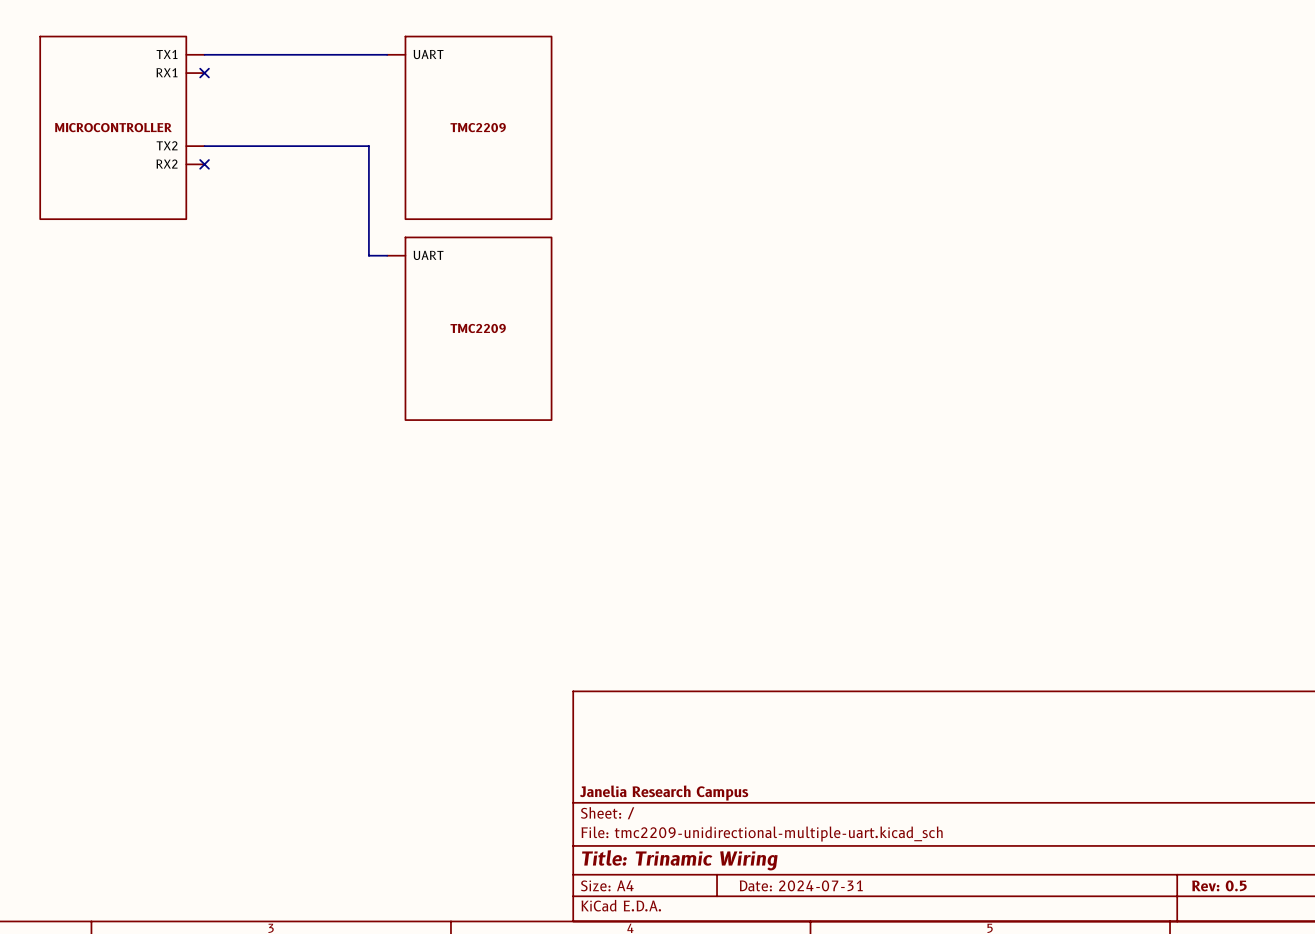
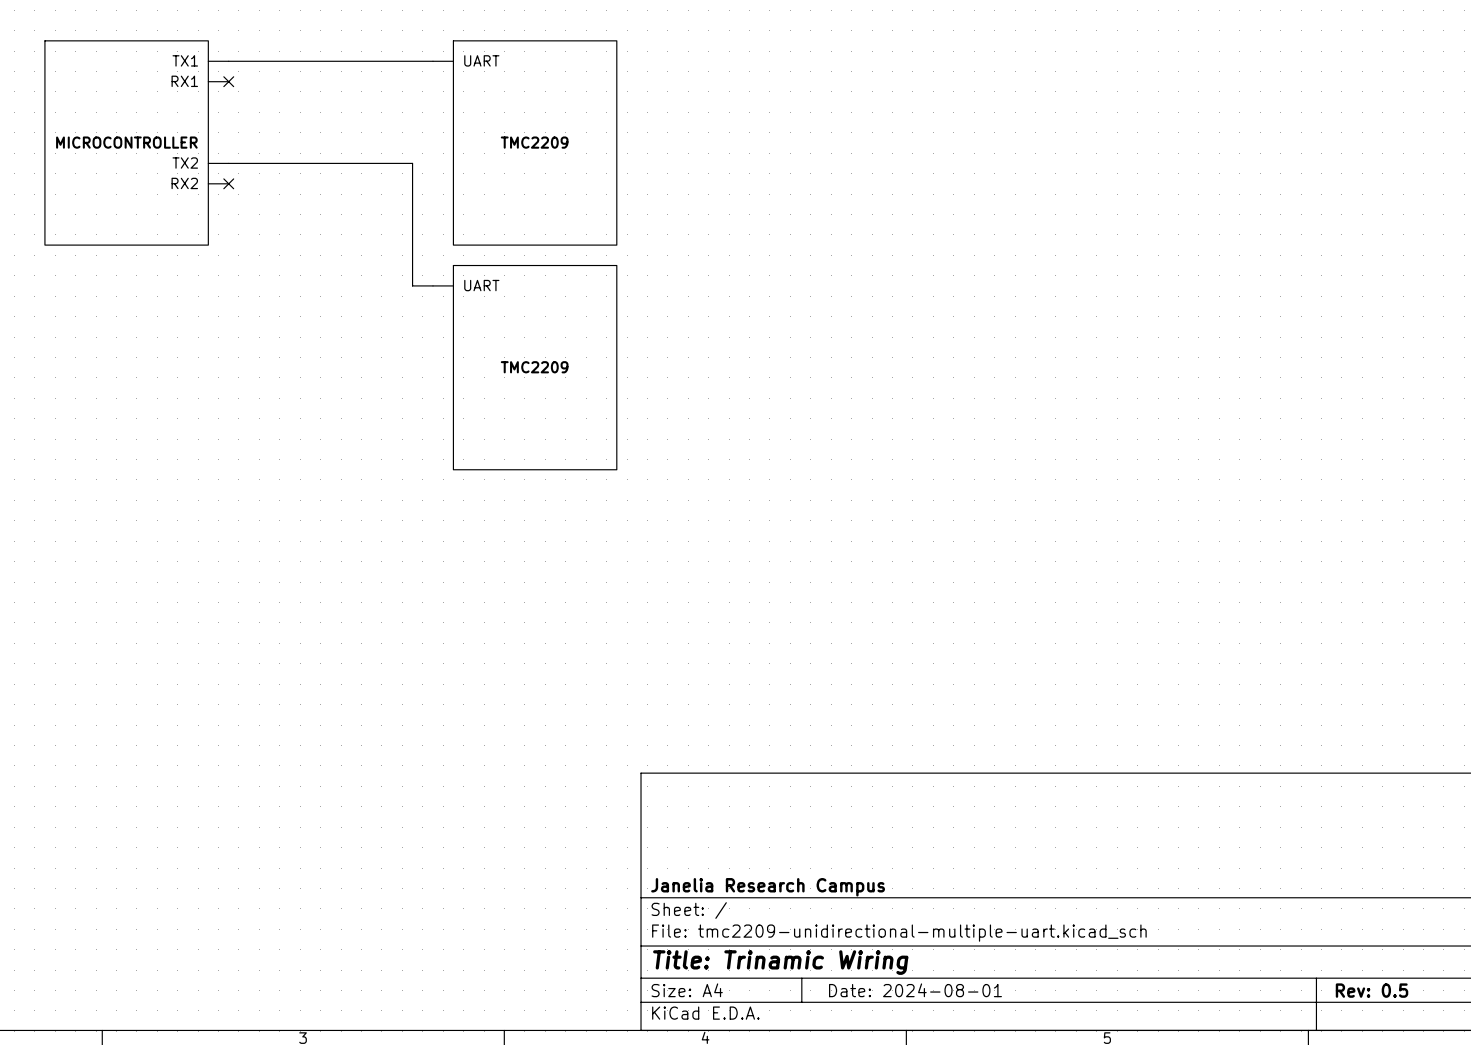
title block: Date: 2024-07-31 (801, 885) -> Date: 2024-08-01 (915, 990)

